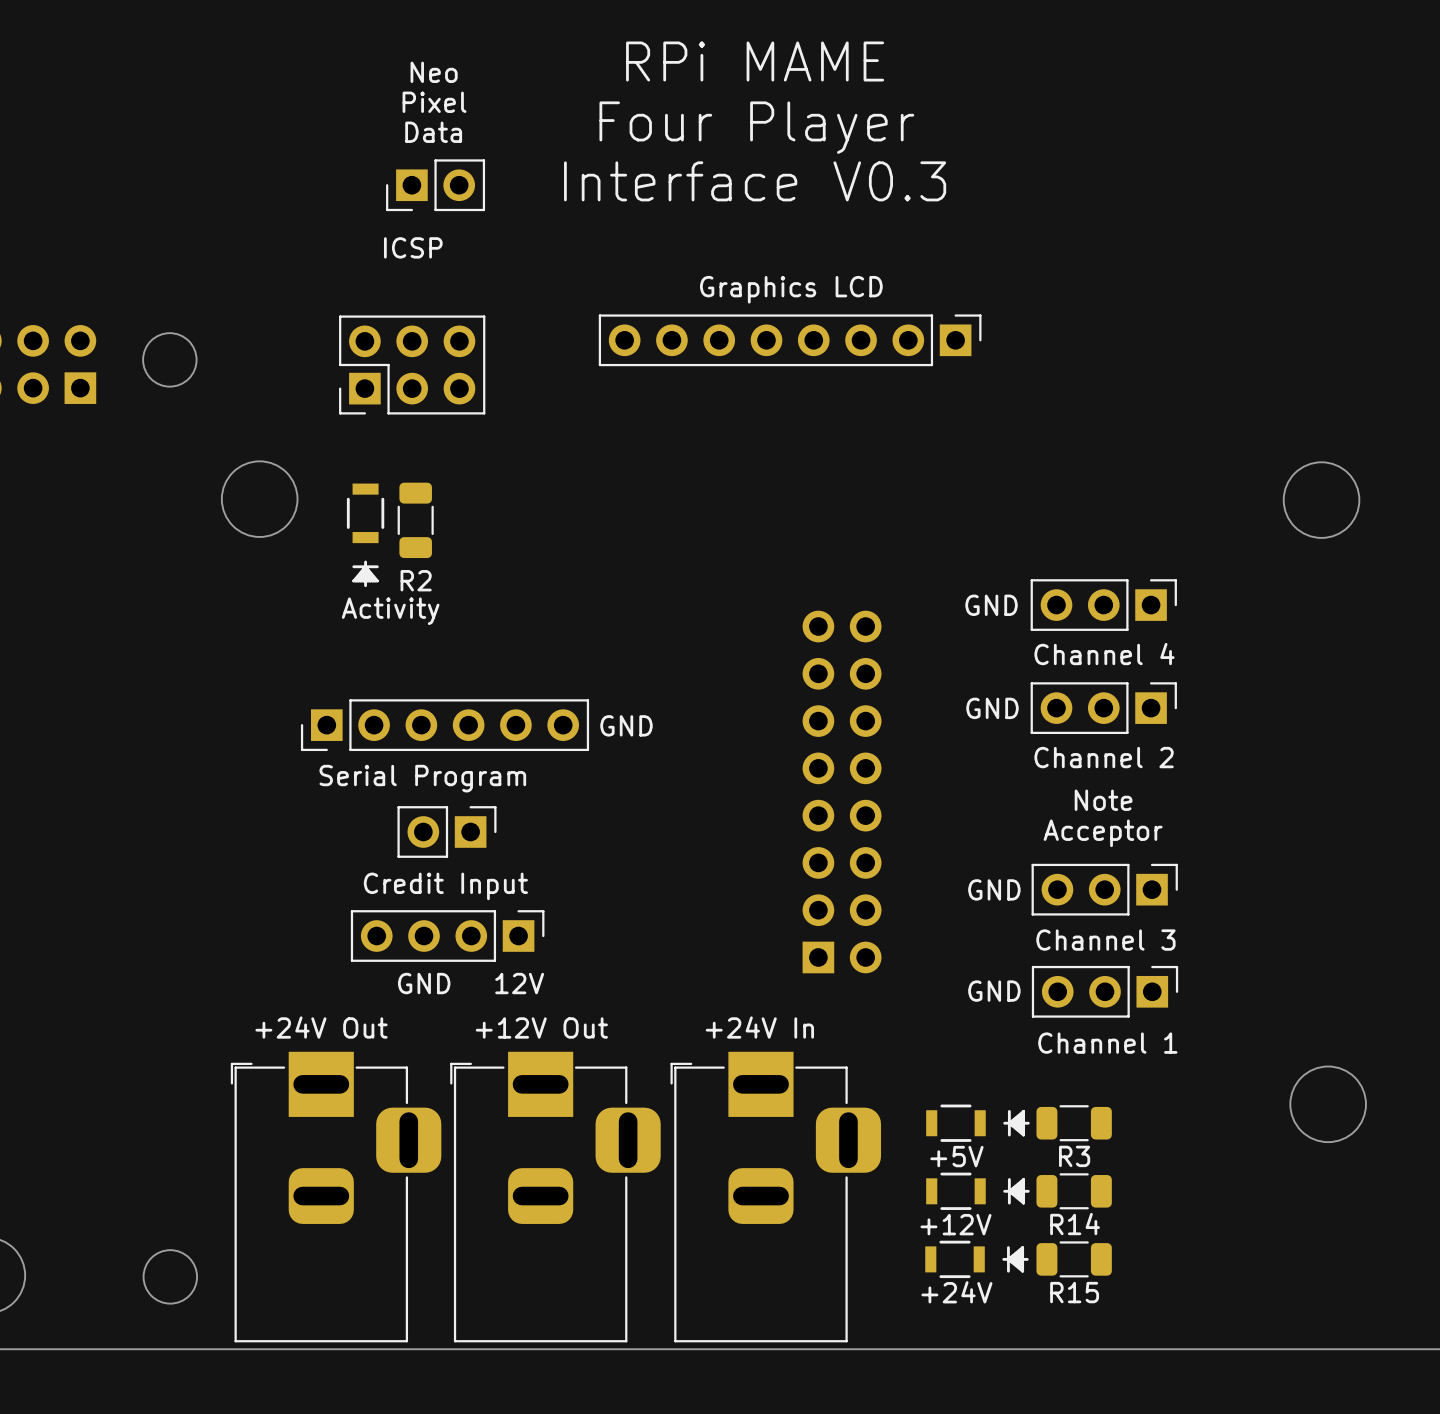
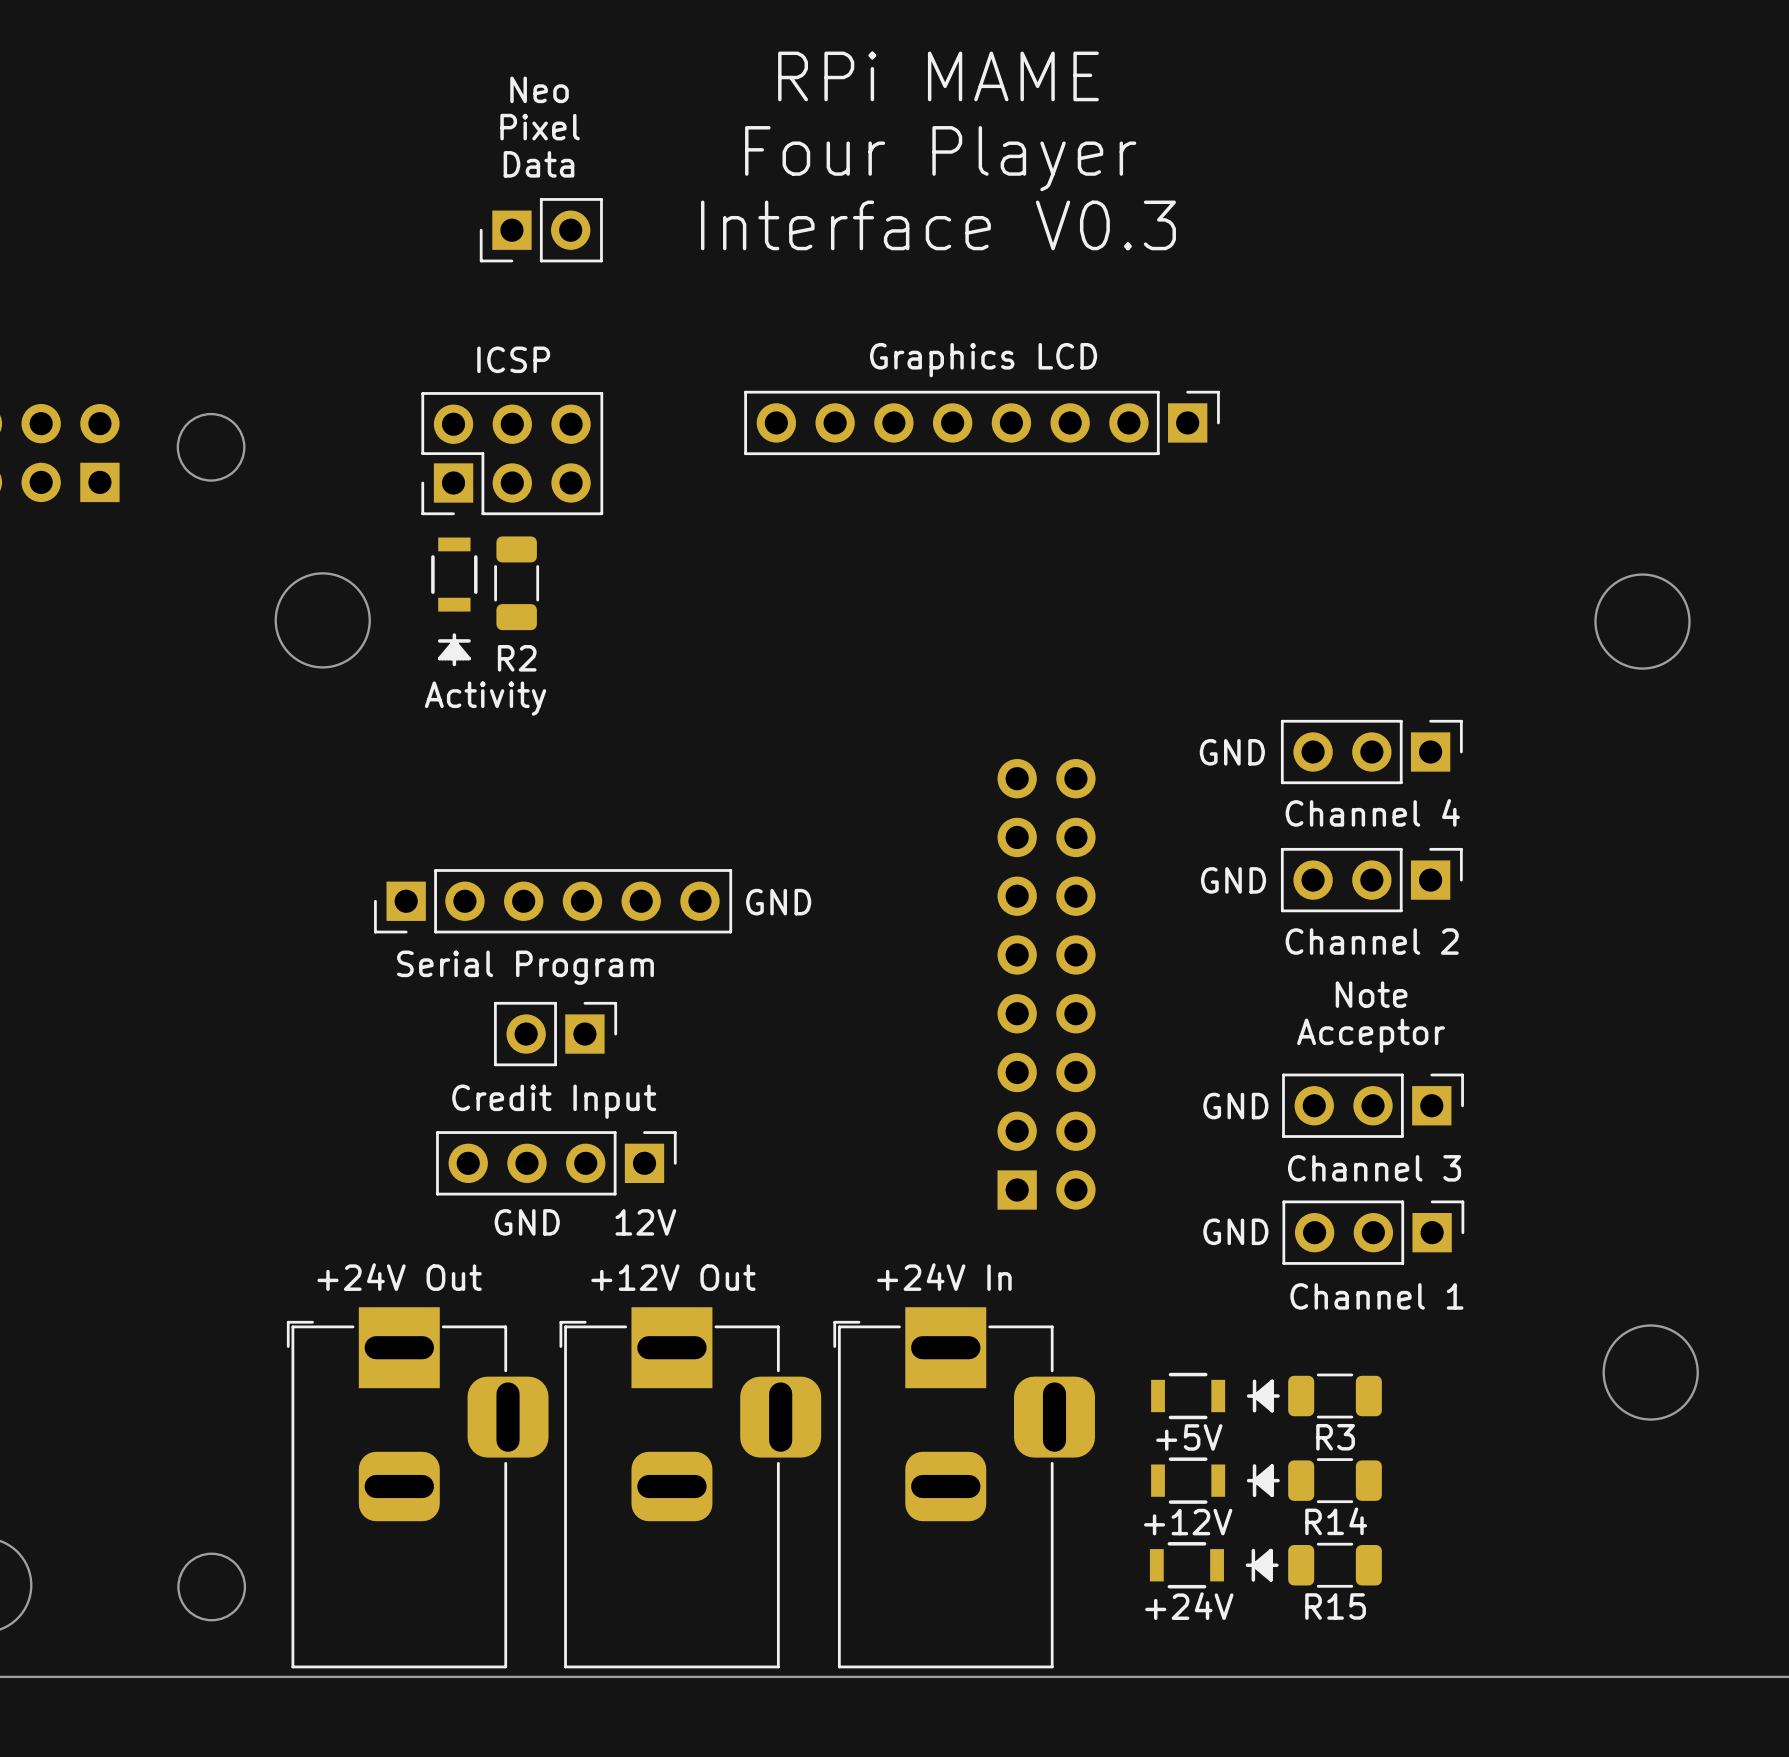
text position: ICSP (413, 247) -> ICSP (513, 359)
R2 position: (415, 520) -> (516, 583)
part position: (365, 535) -> (454, 601)
text position: Activity (390, 611) -> Activity (485, 698)

